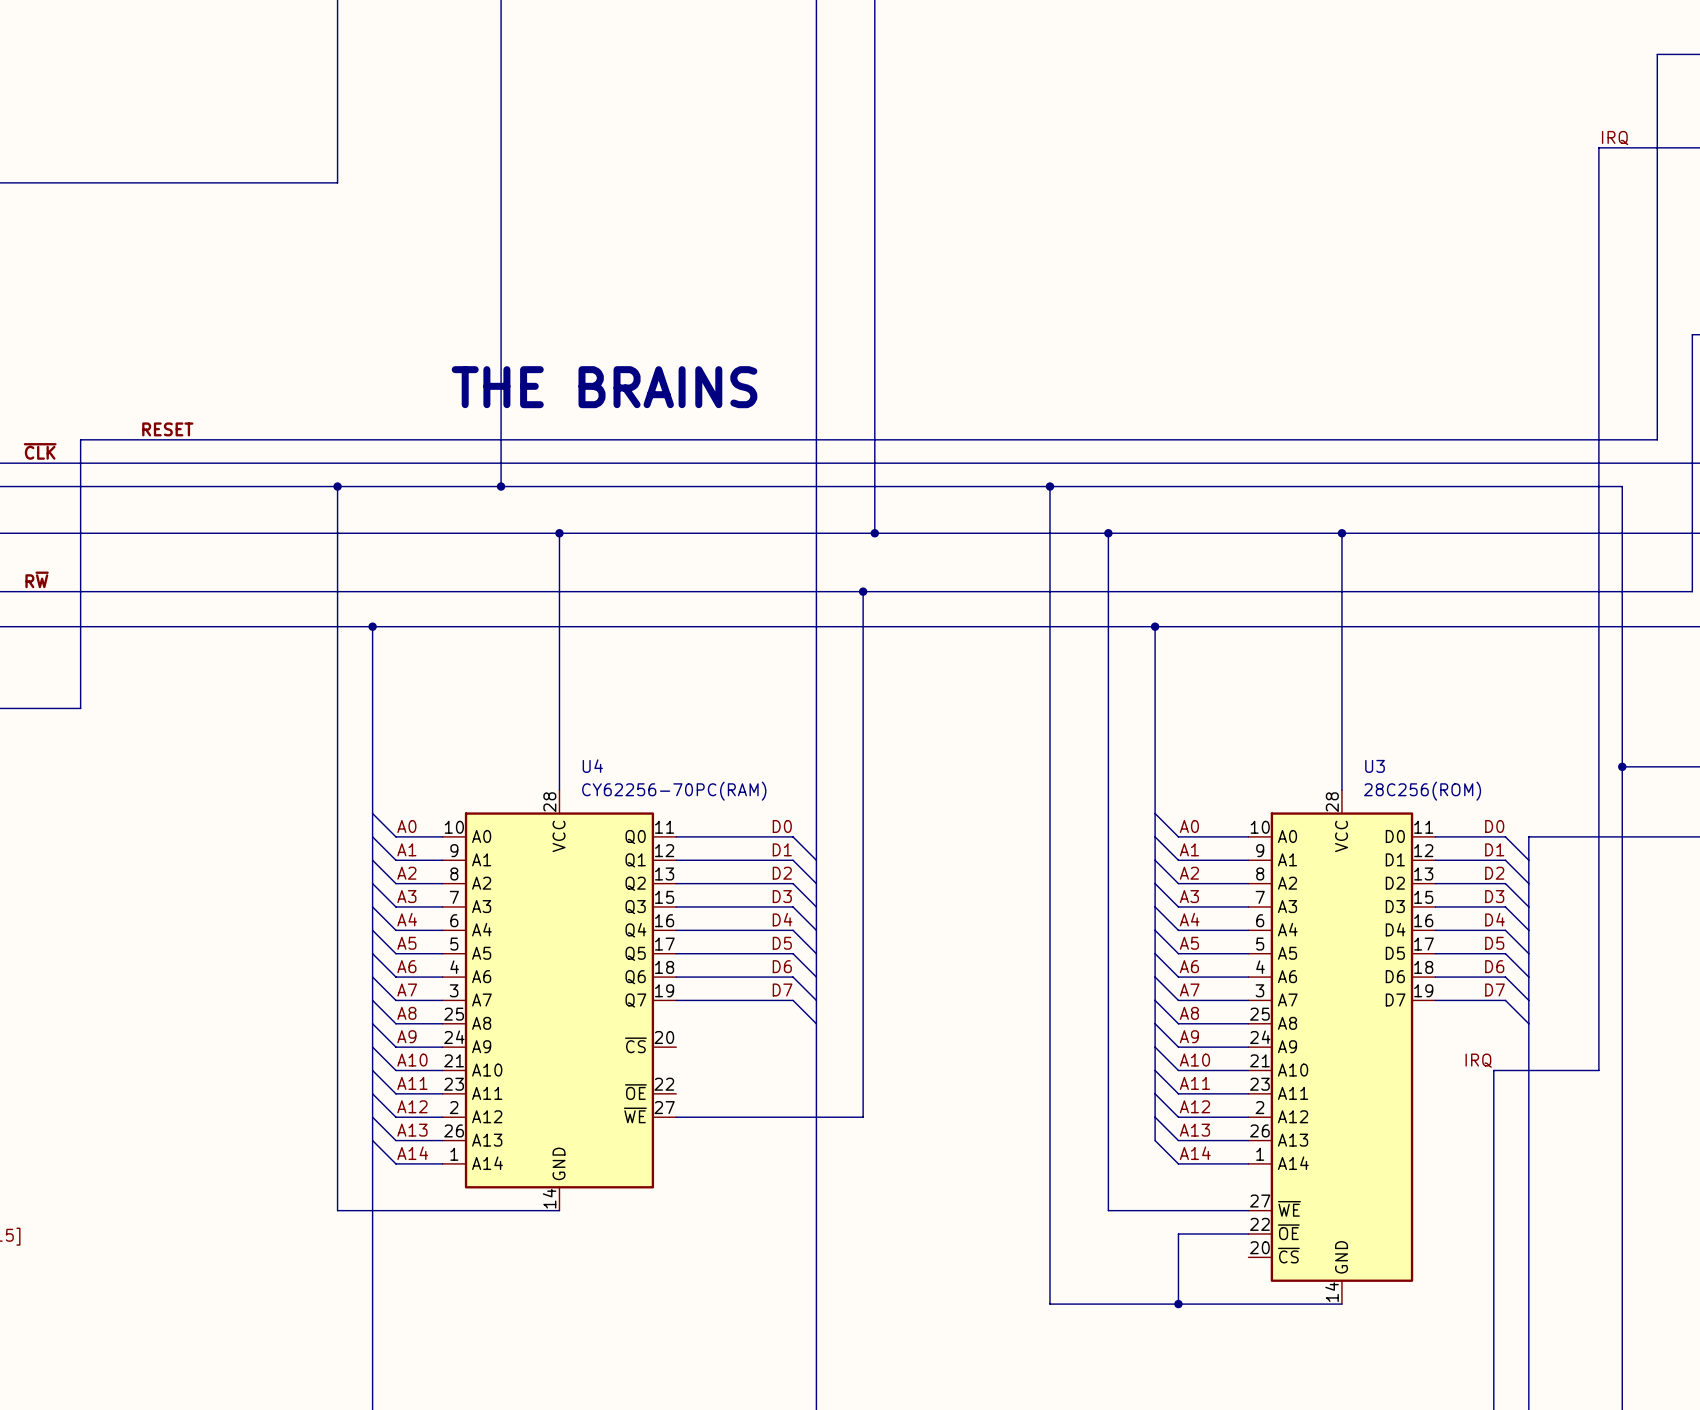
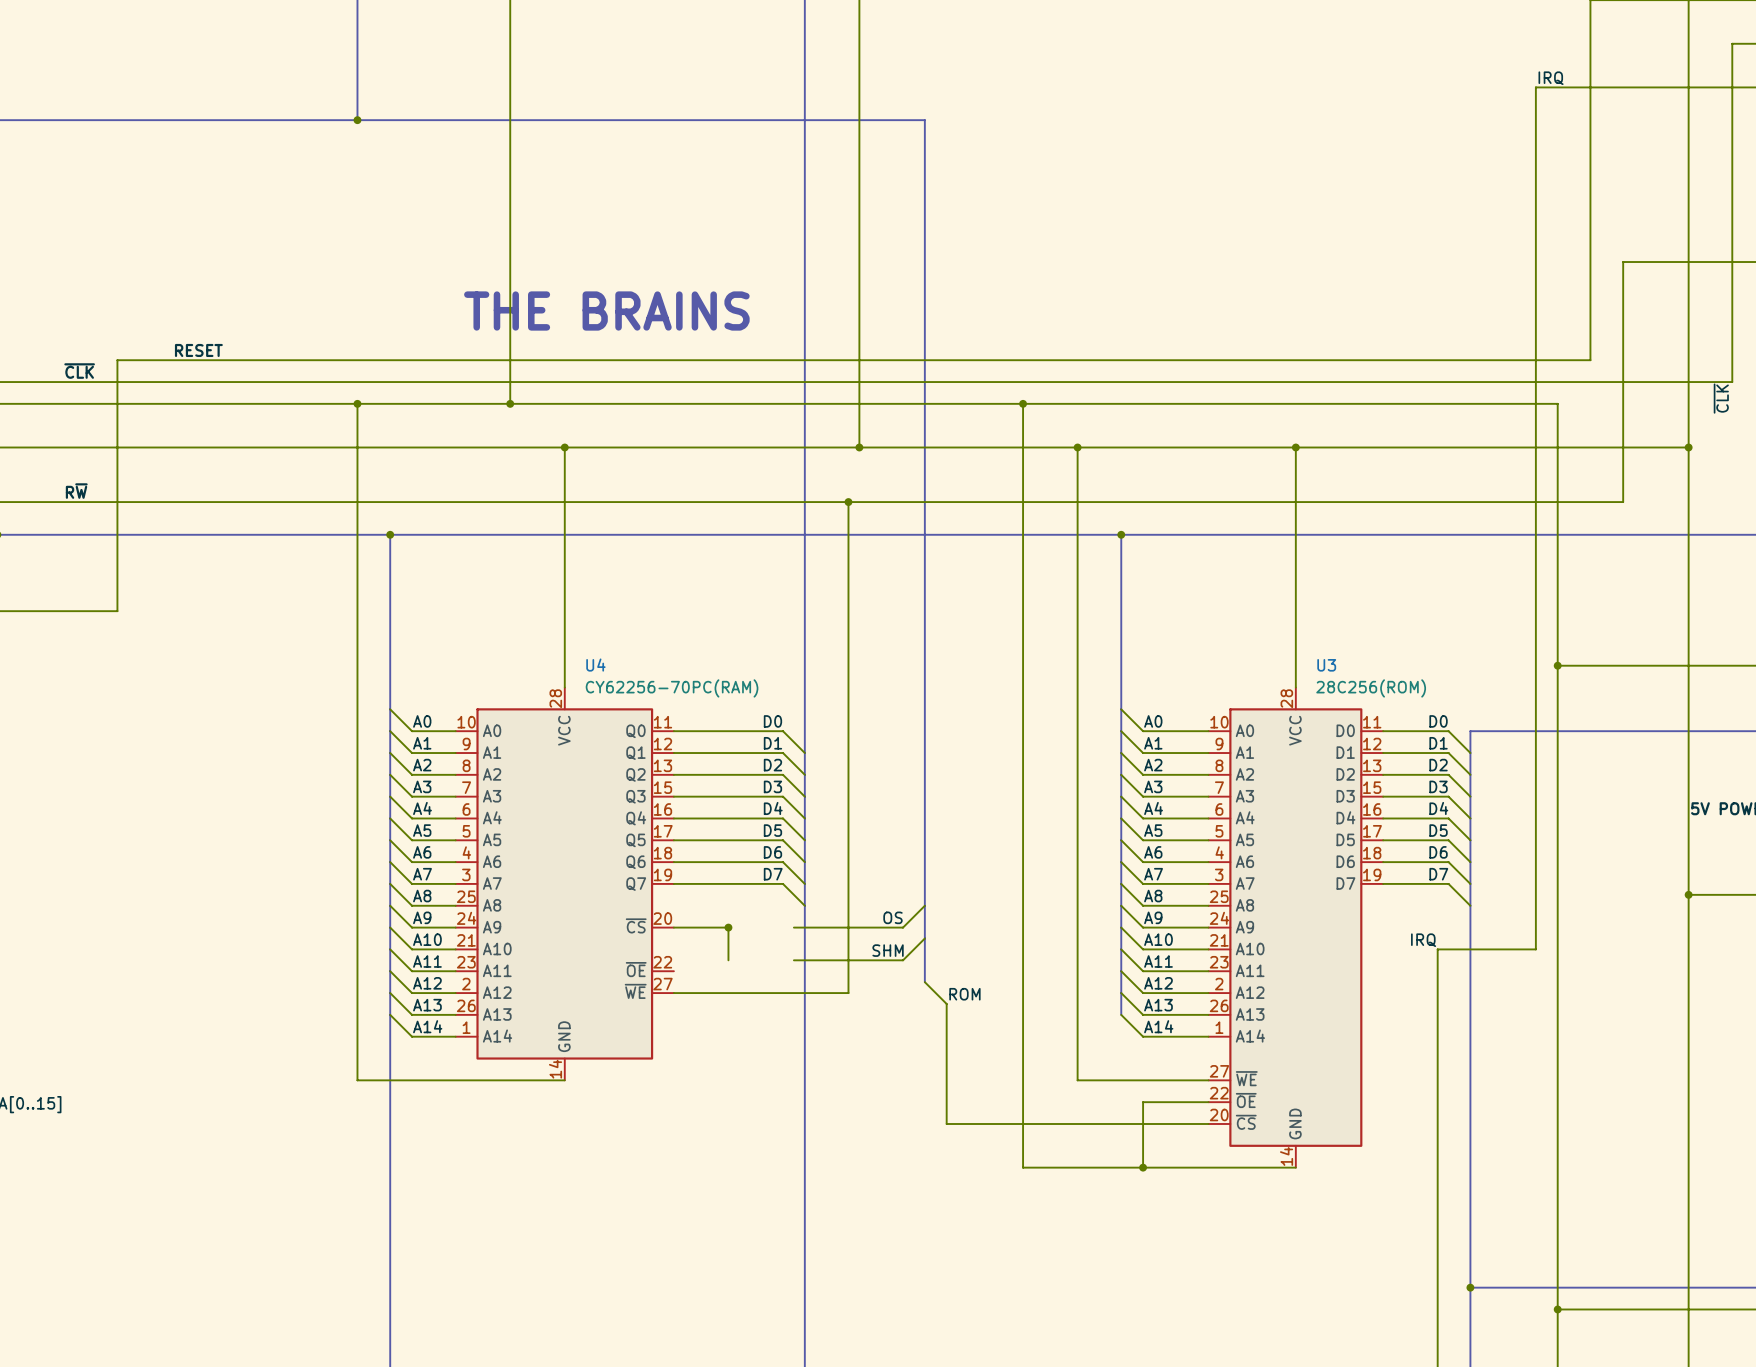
bus: none -> (357, 120) (924, 120) (924, 982)
junction: none -> (357, 120)
wire: none -> (924, 905) (903, 927) (793, 927)
label: none -> OS (892, 917)
wire: none -> (673, 927) (728, 927) (728, 960)
junction: none -> (728, 927)
wire: none -> (924, 938) (903, 960) (793, 960)
label: none -> SHM (888, 950)
wire: none -> (924, 982) (946, 1003) (946, 1123) (1208, 1123)
label: none -> ROM (964, 994)

